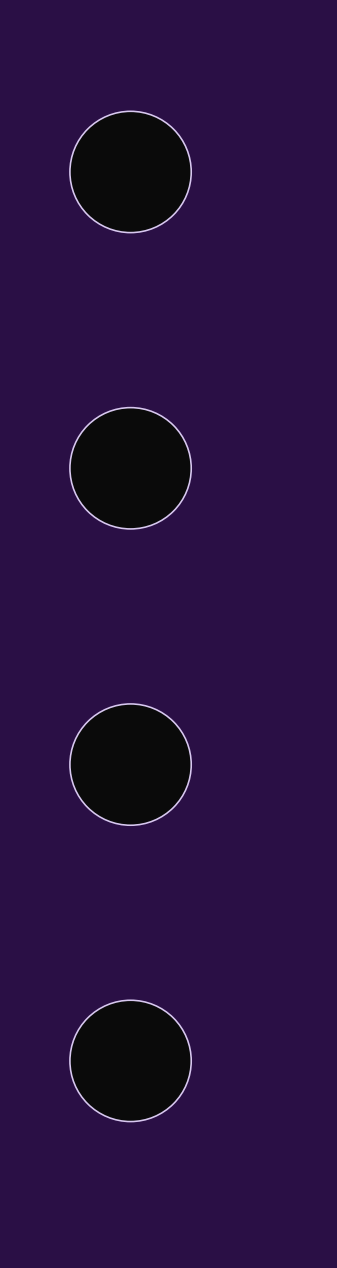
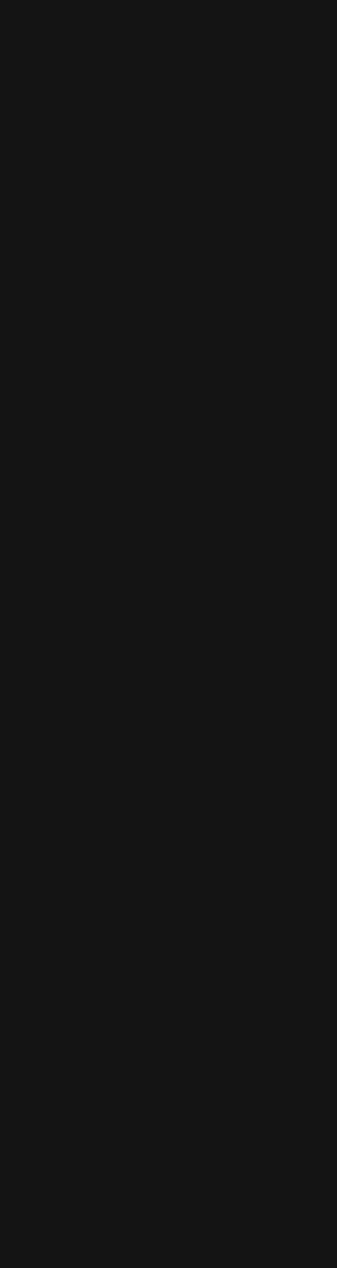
part: (130, 171) -> none
part: (130, 468) -> none
part: (130, 764) -> none
part: (130, 1060) -> none

